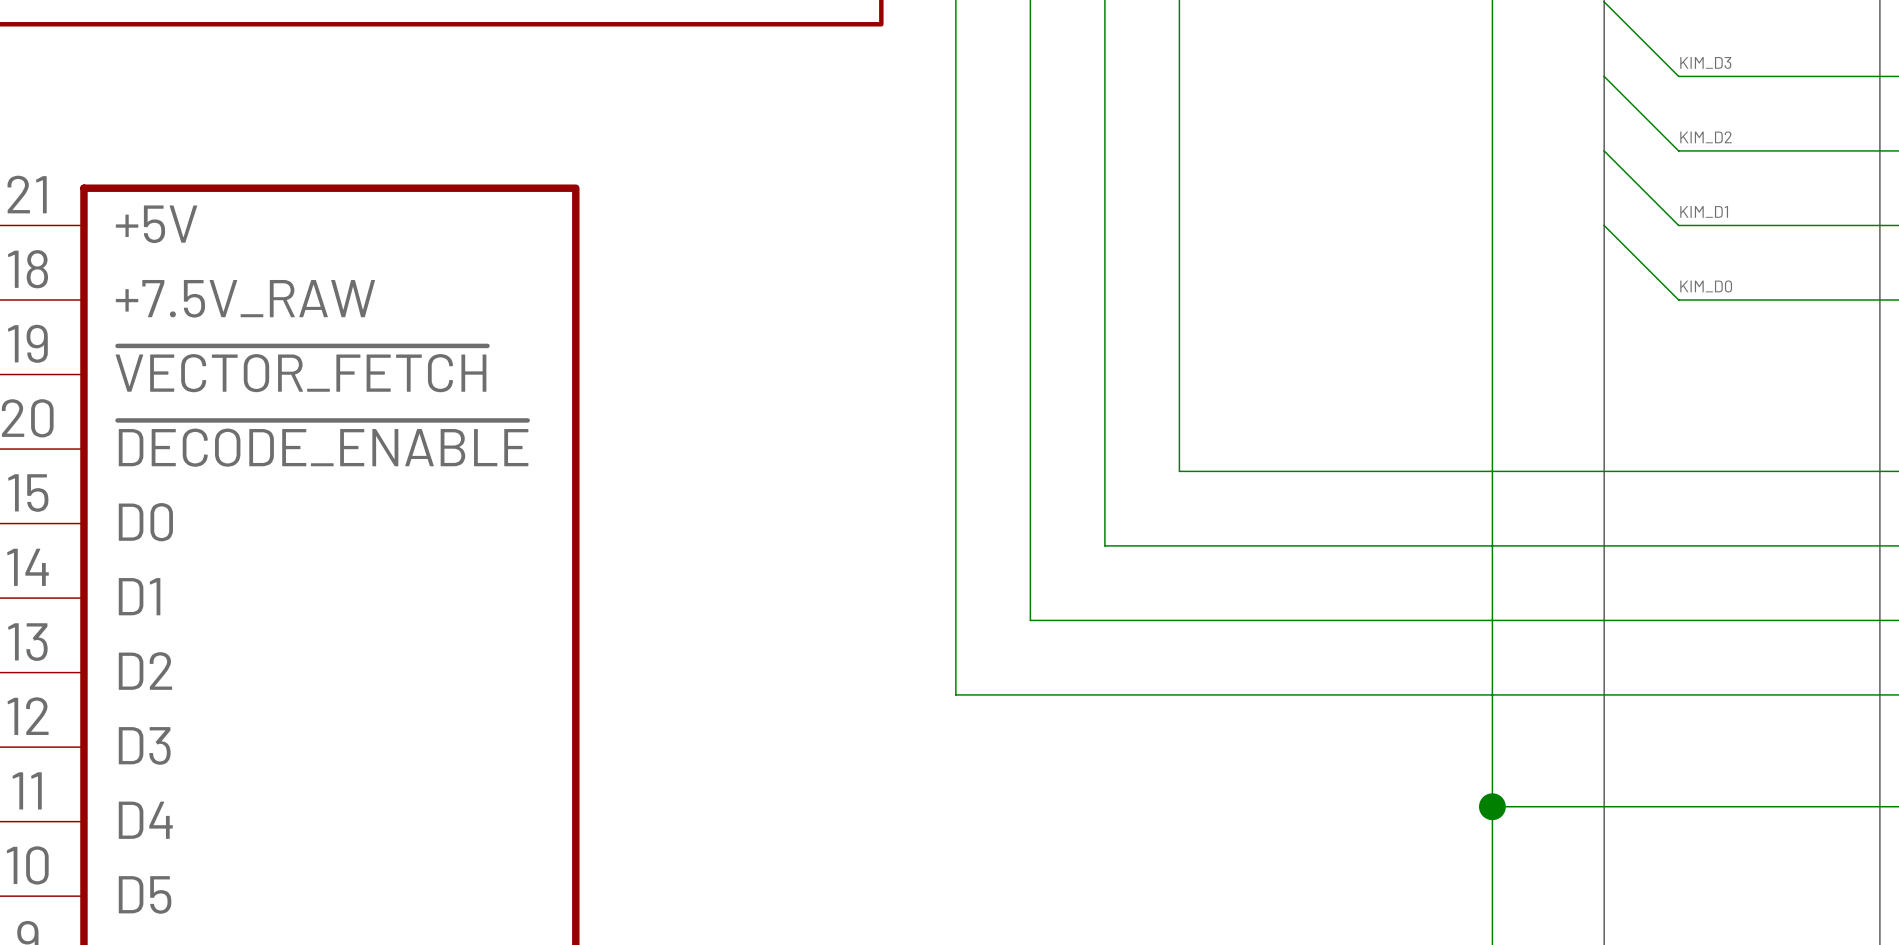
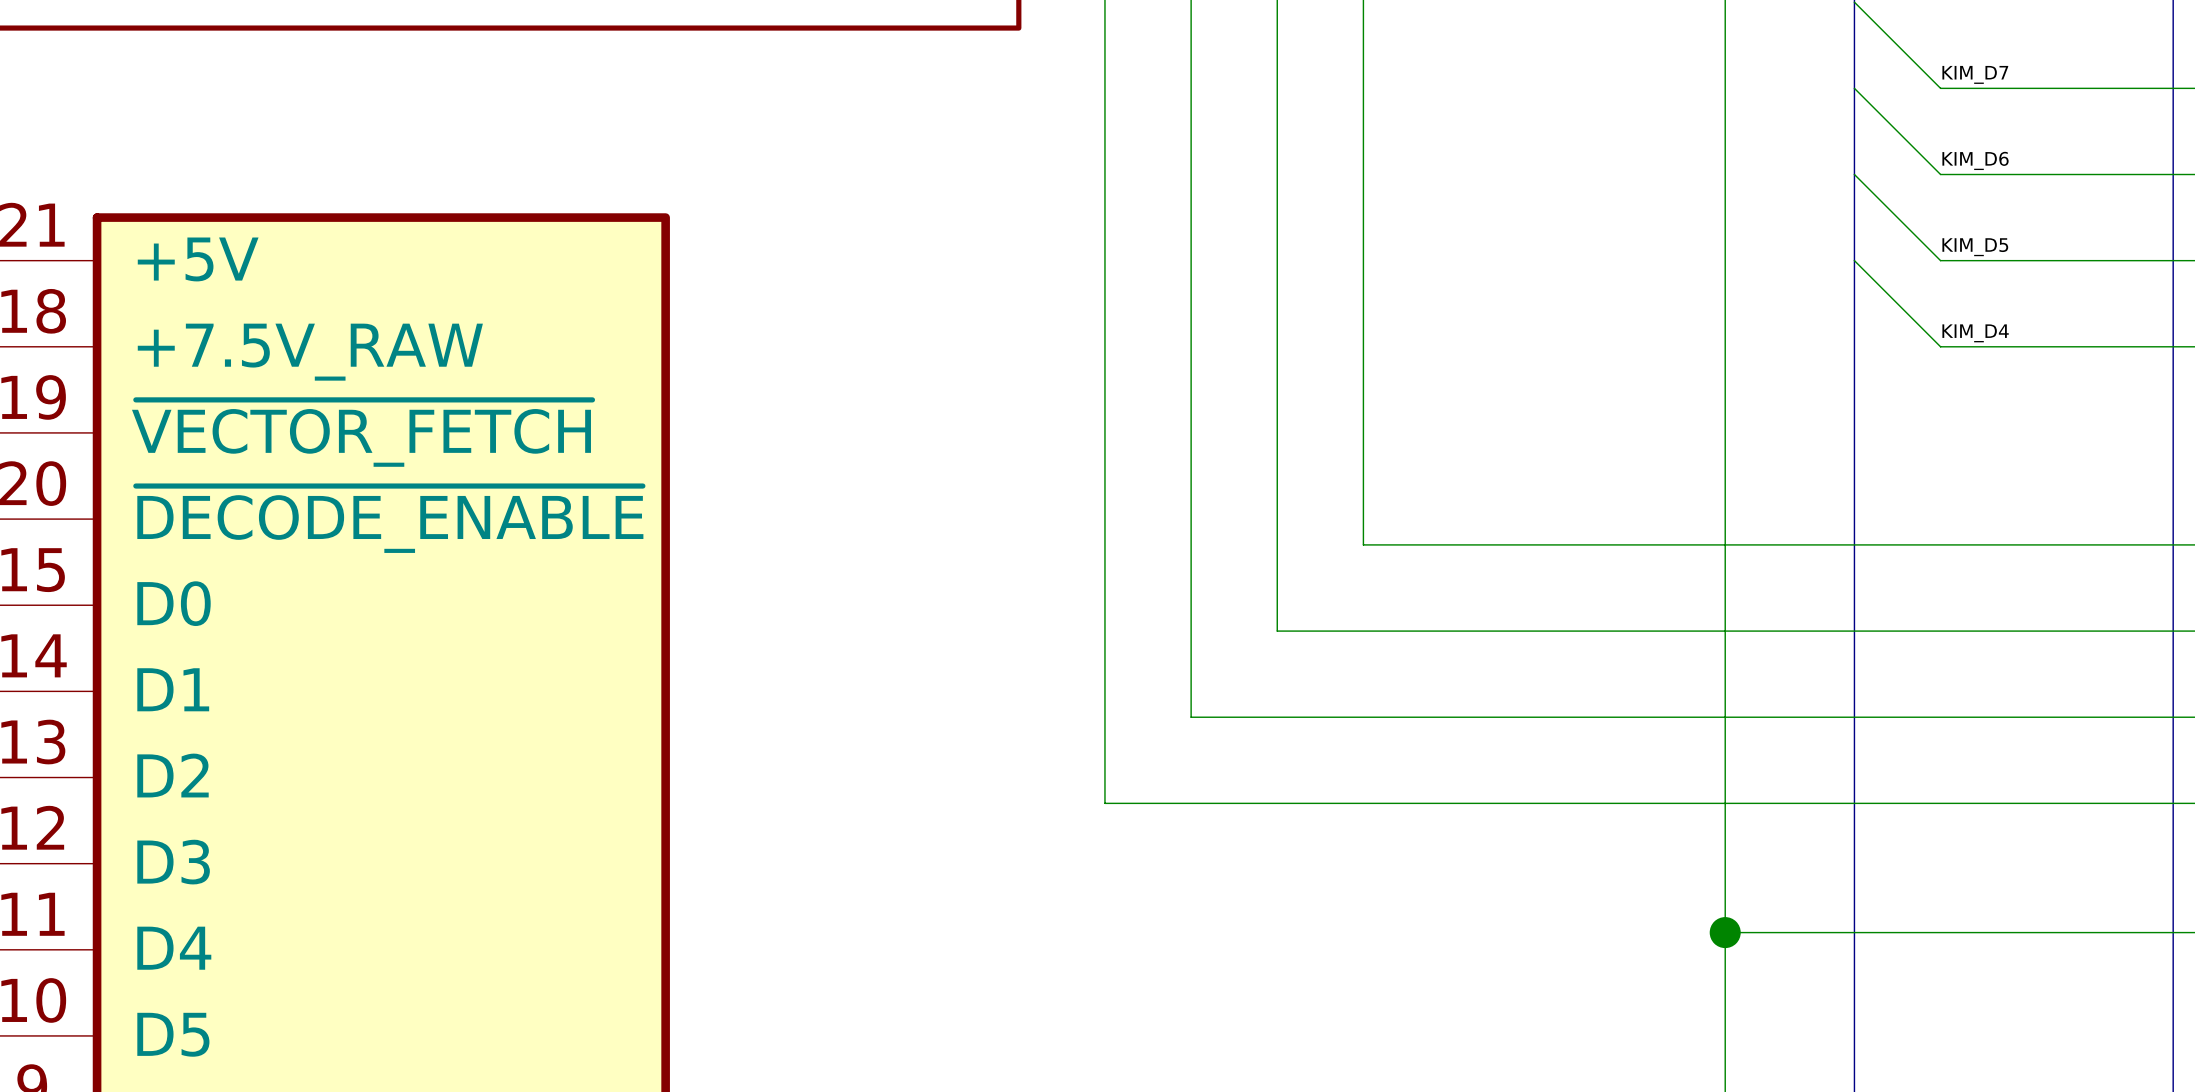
label: KIM_D3 (1705, 62) -> KIM_D7 (1975, 74)
label: KIM_D2 (1706, 137) -> KIM_D6 (1975, 160)
label: KIM_D1 (1704, 211) -> KIM_D5 (1975, 247)
label: KIM_D0 (1706, 286) -> KIM_D4 (1975, 333)

